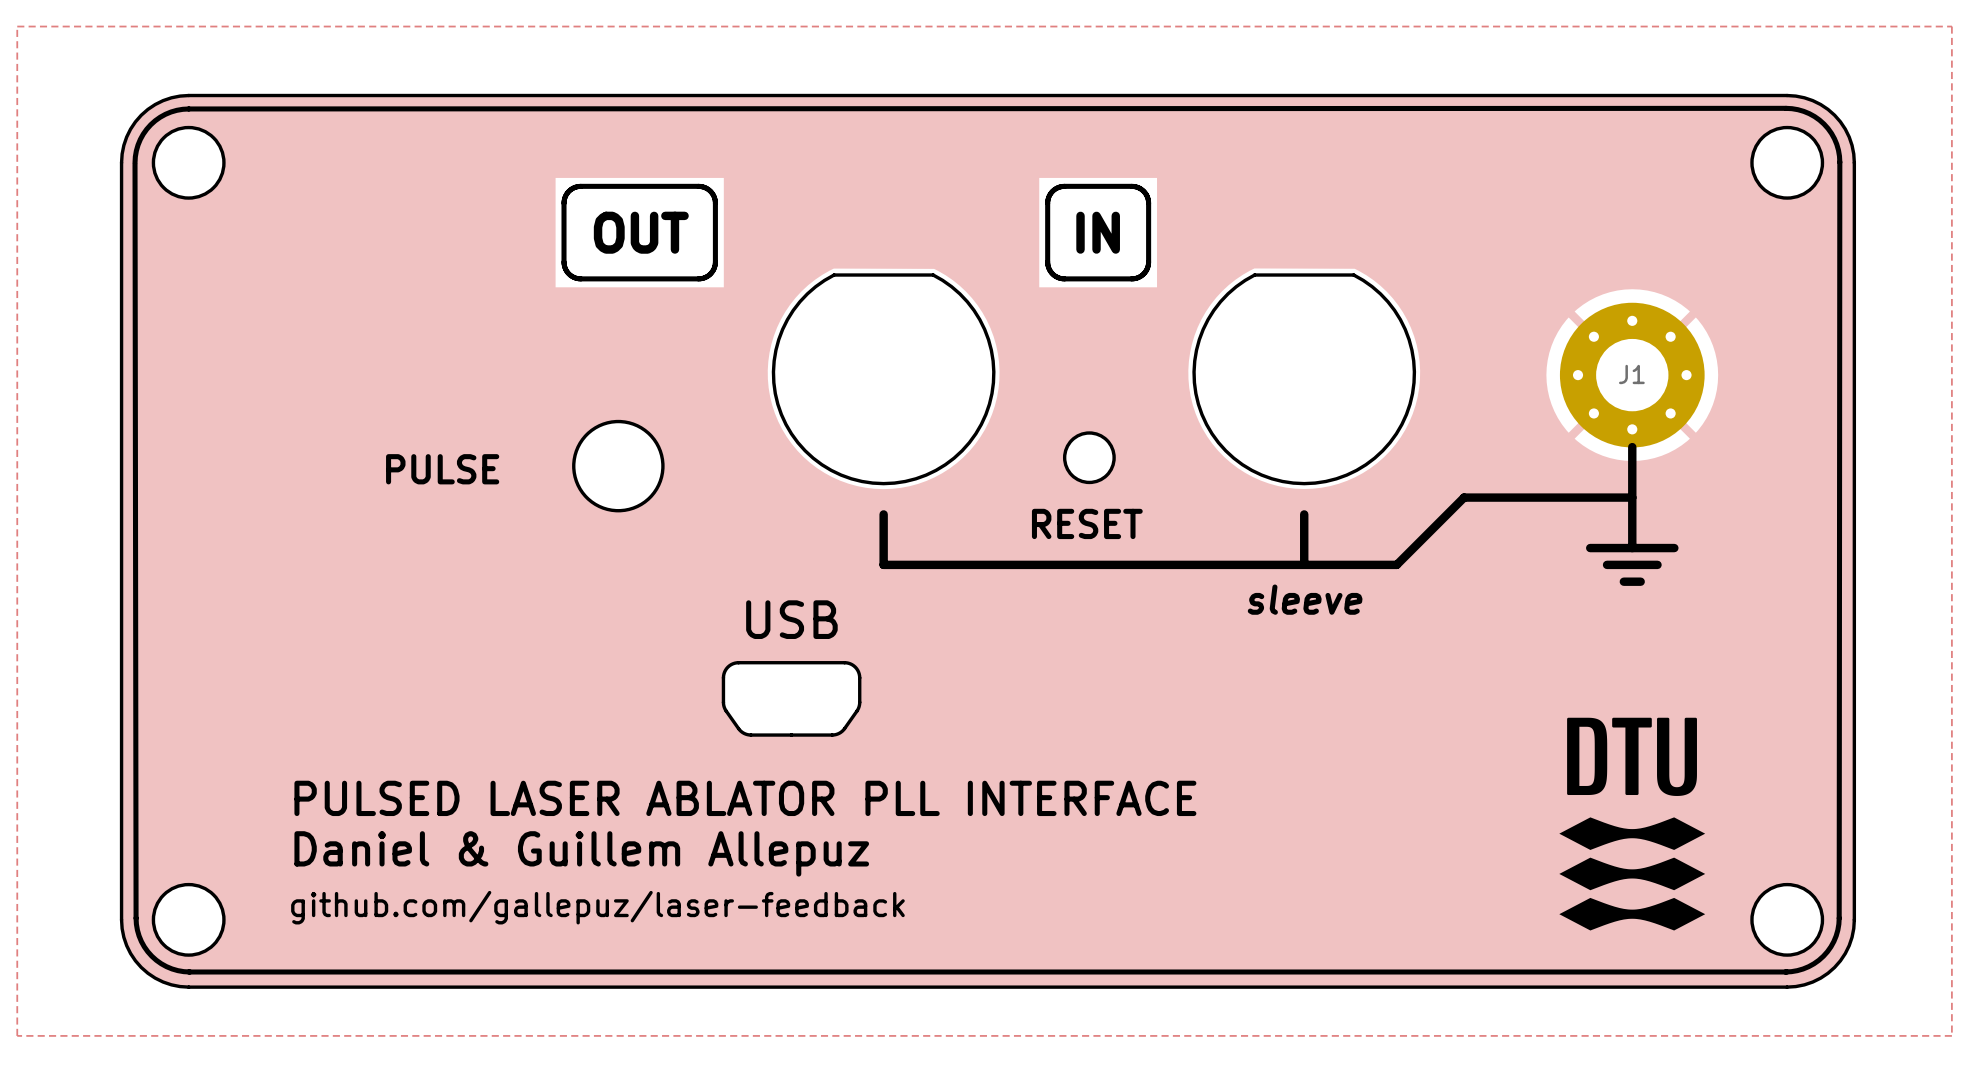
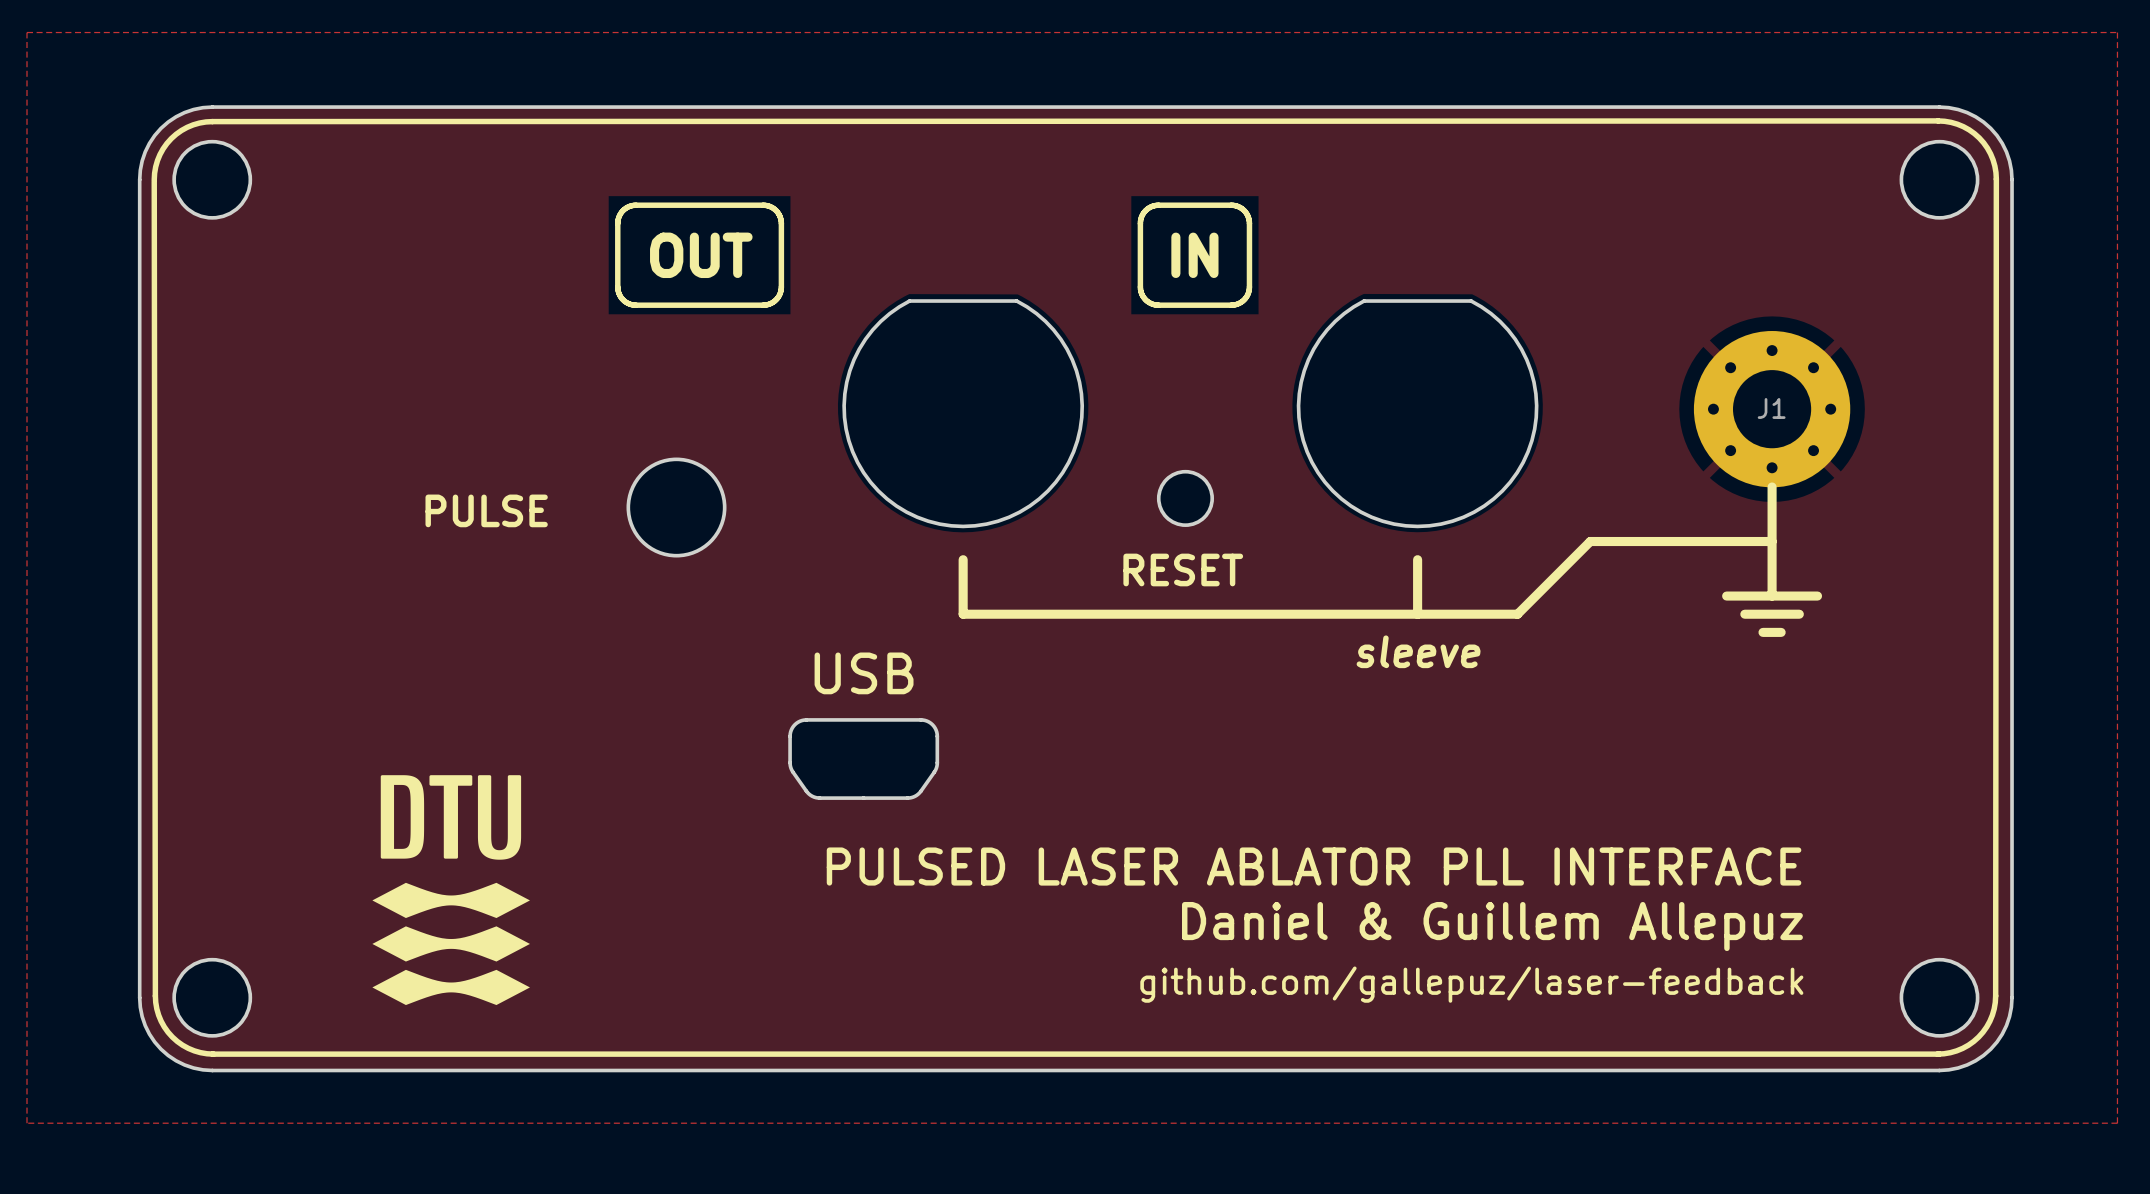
drawing: none -> [380, 775, 522, 860]
drawing: [1567, 717, 1697, 796] -> none
text: PULSED LASER ABLATOR PLL INTERFACE (745, 798) -> none
text: none -> PULSED LASER ABLATOR PLL INTERFACE (1314, 866)
drawing: none -> [372, 882, 530, 1006]
drawing: [1559, 817, 1706, 931] -> none
text: Daniel & Guillem Allepuz (581, 853) -> none
text: none -> Daniel & Guillem Allepuz (1492, 926)
text: github.com/gallepuz/laser-feedback (597, 907) -> none
text: none -> github.com/gallepuz/laser-feedback (1471, 984)

